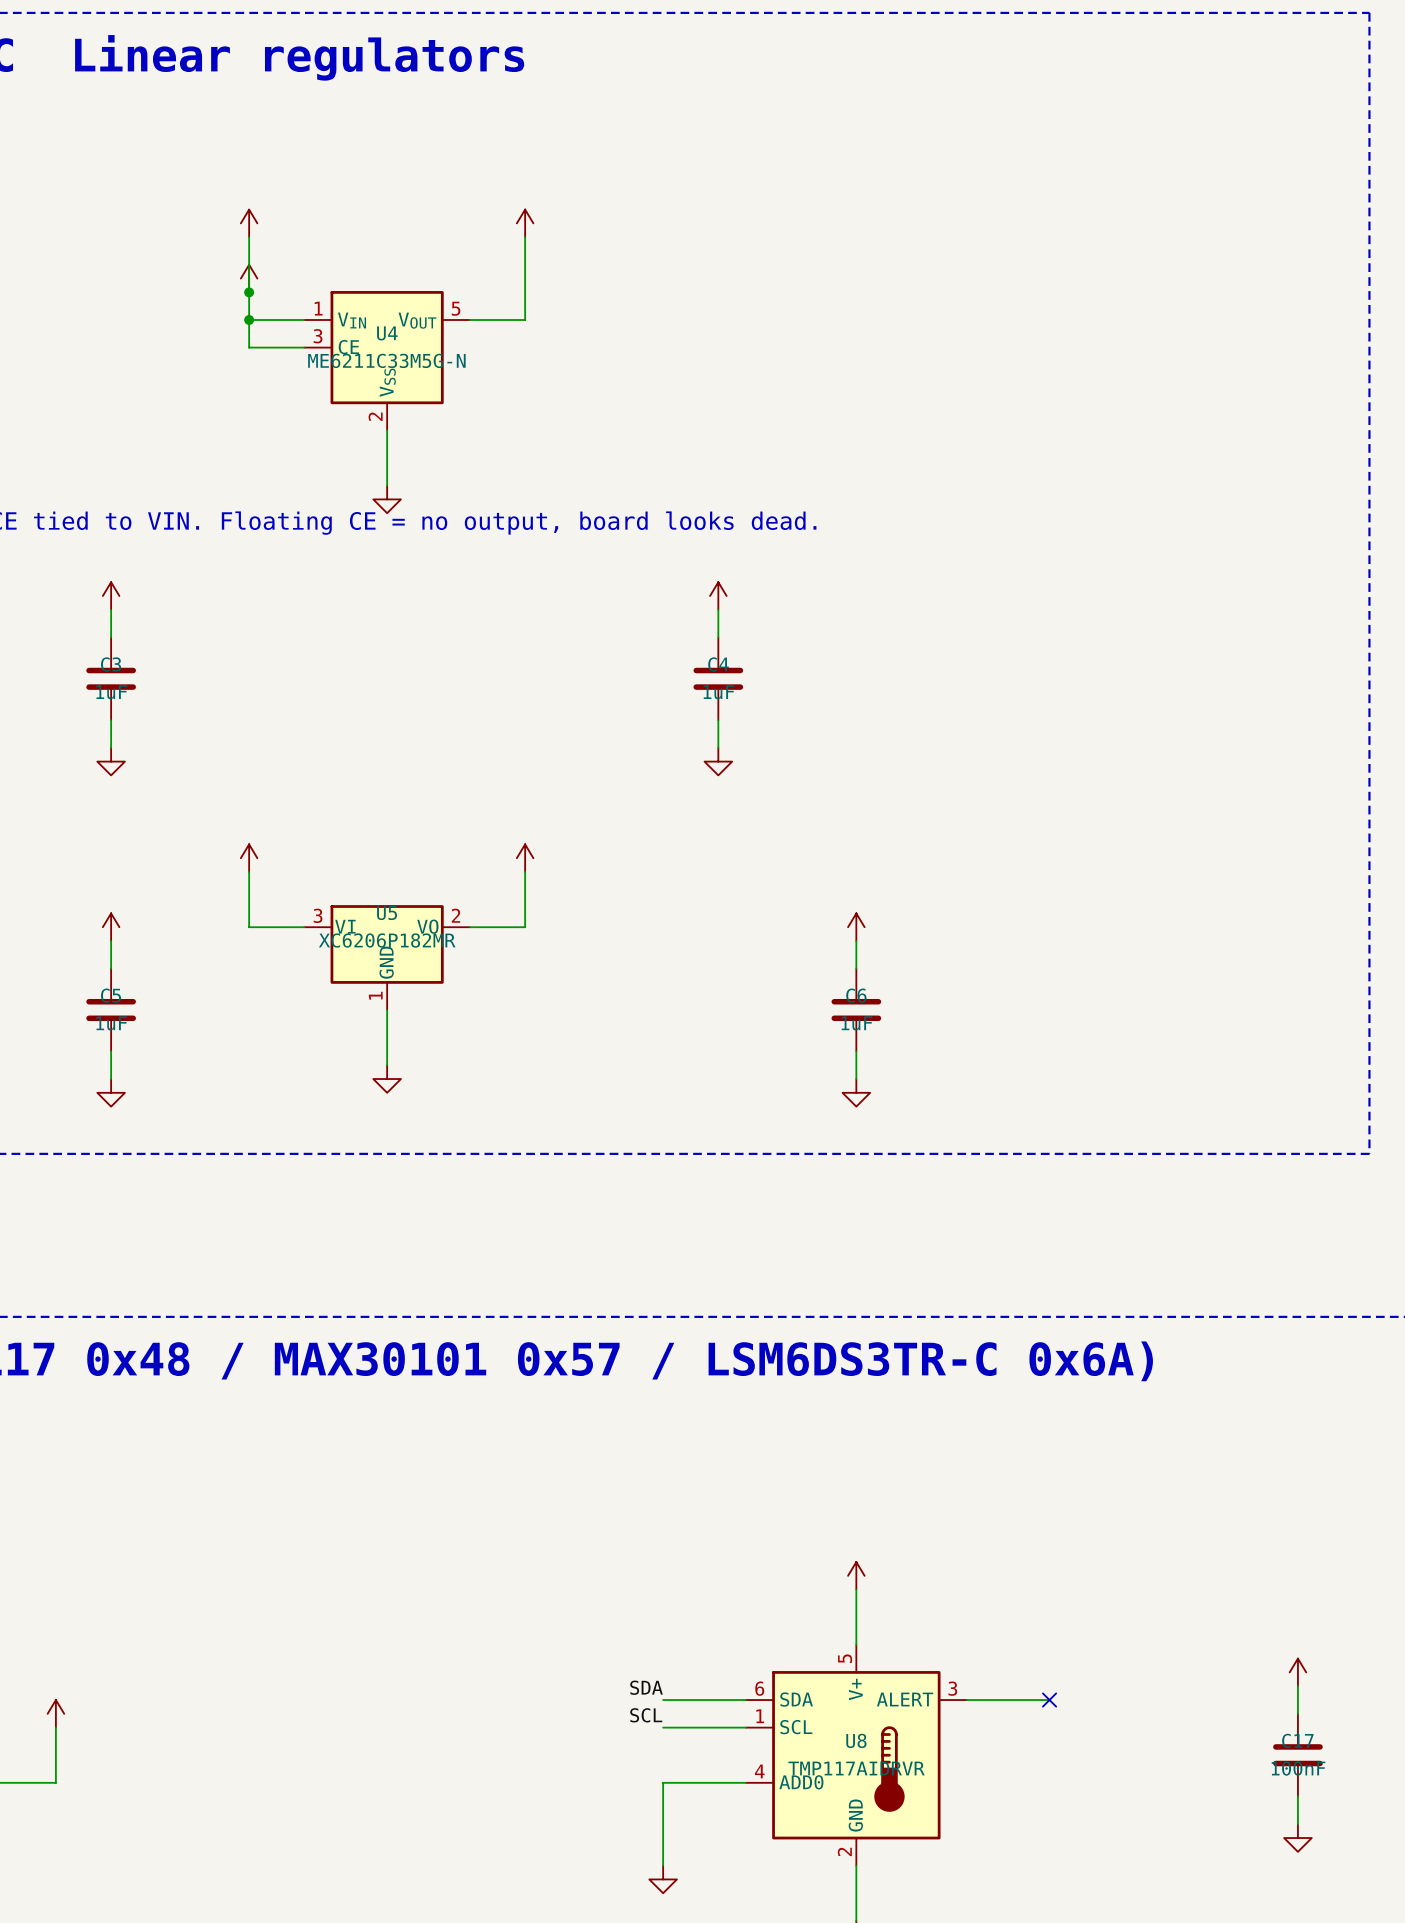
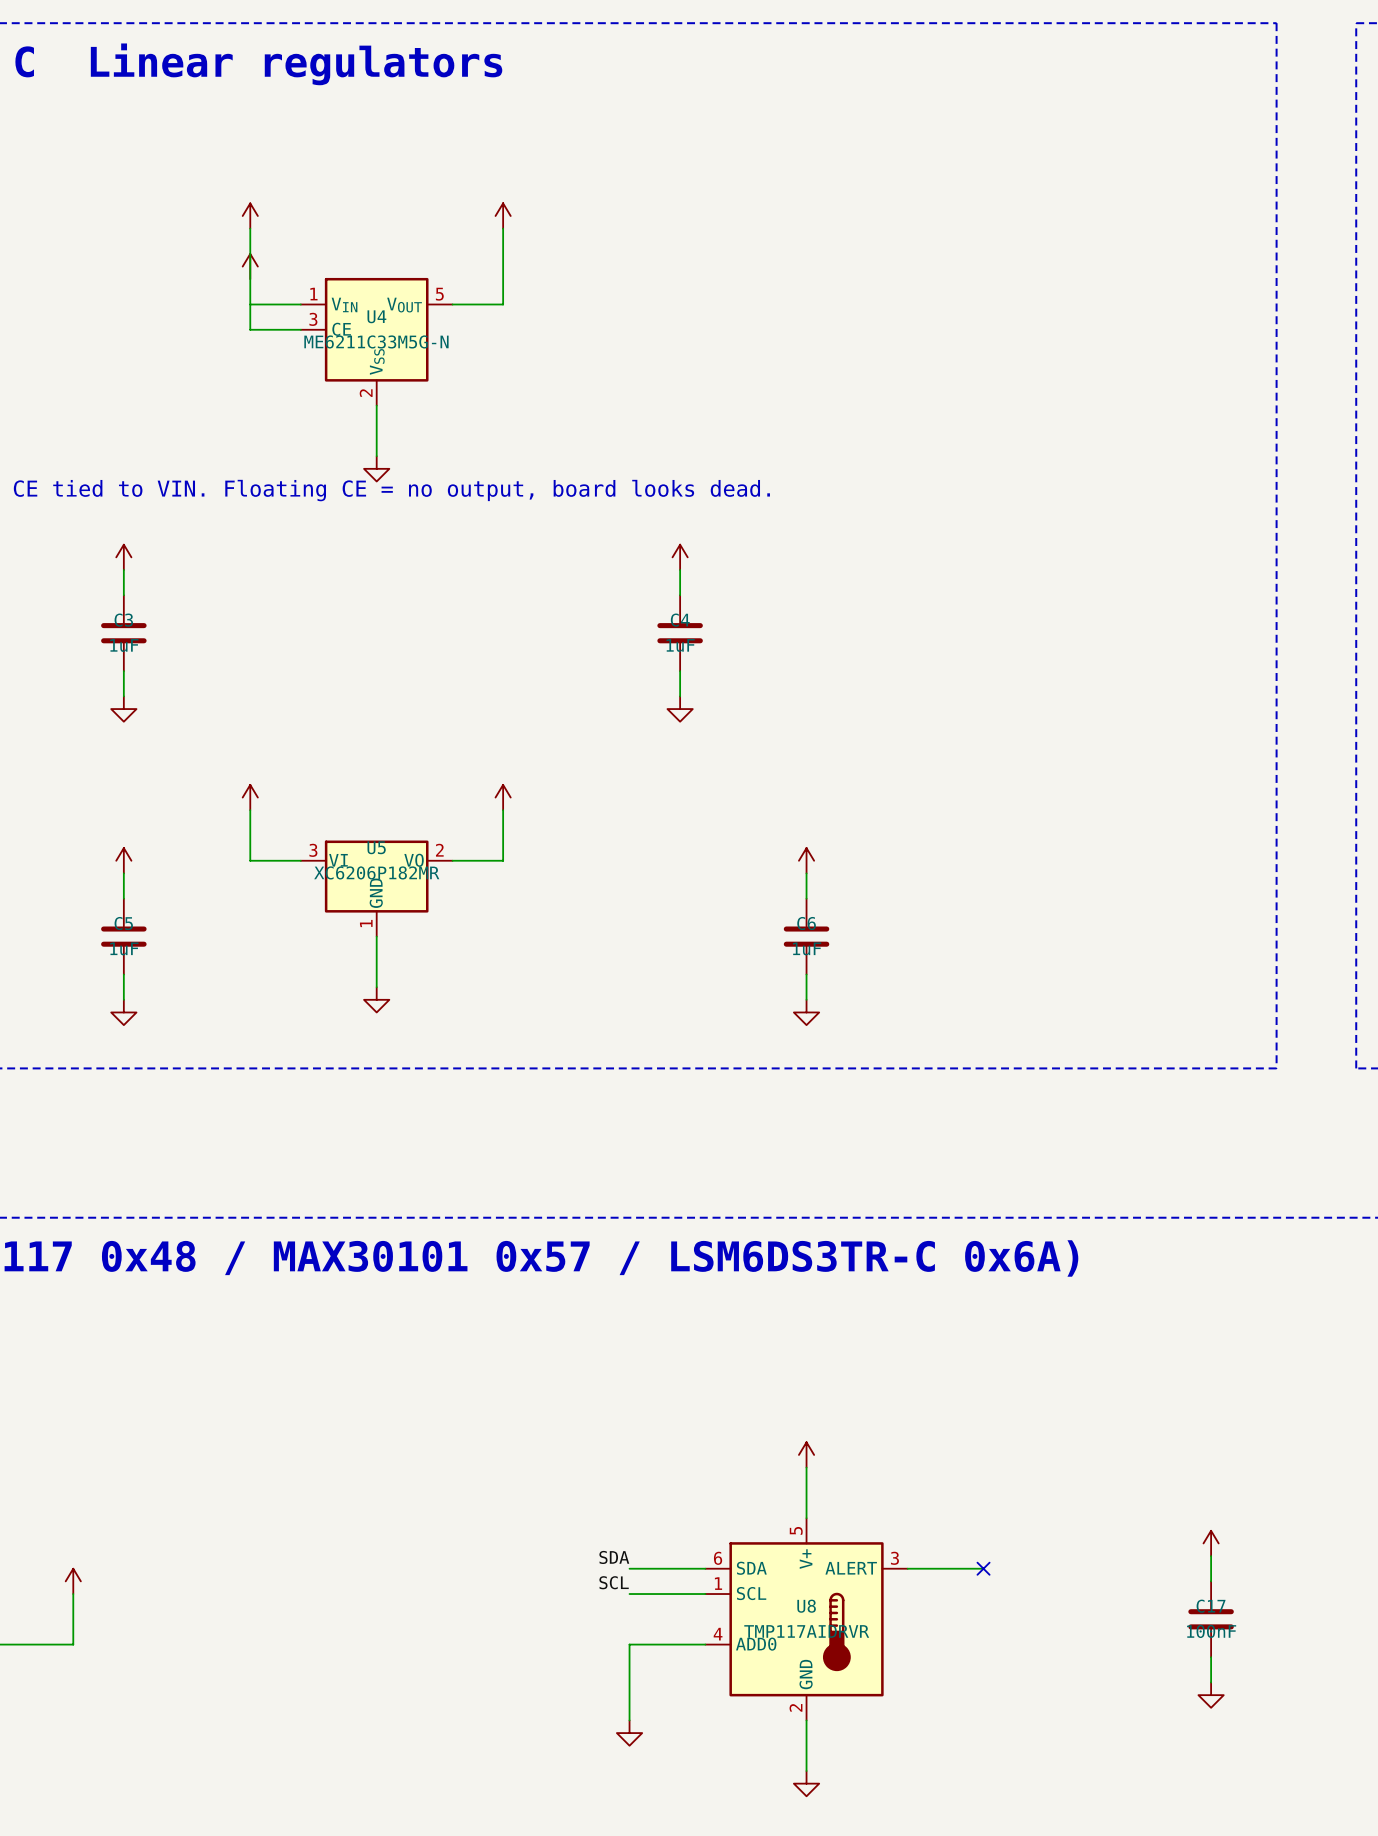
junction: (249, 292) -> none
junction: (249, 320) -> none

